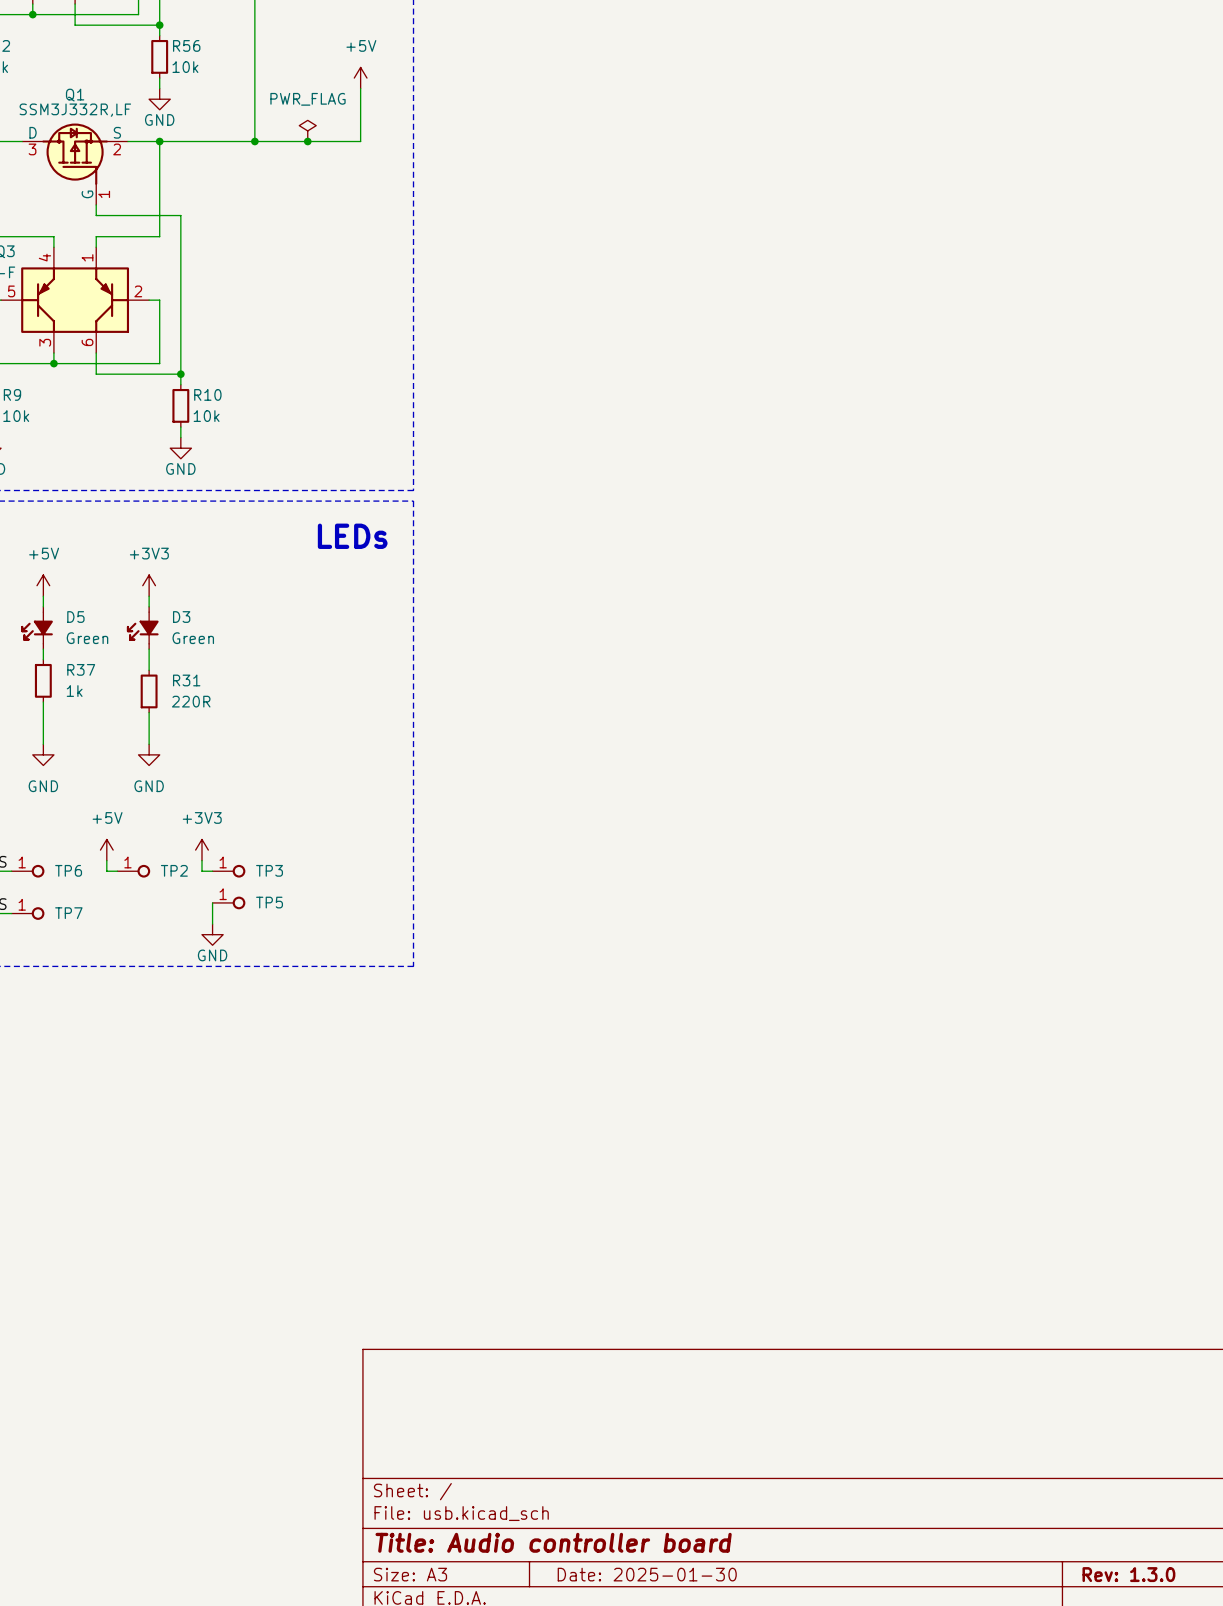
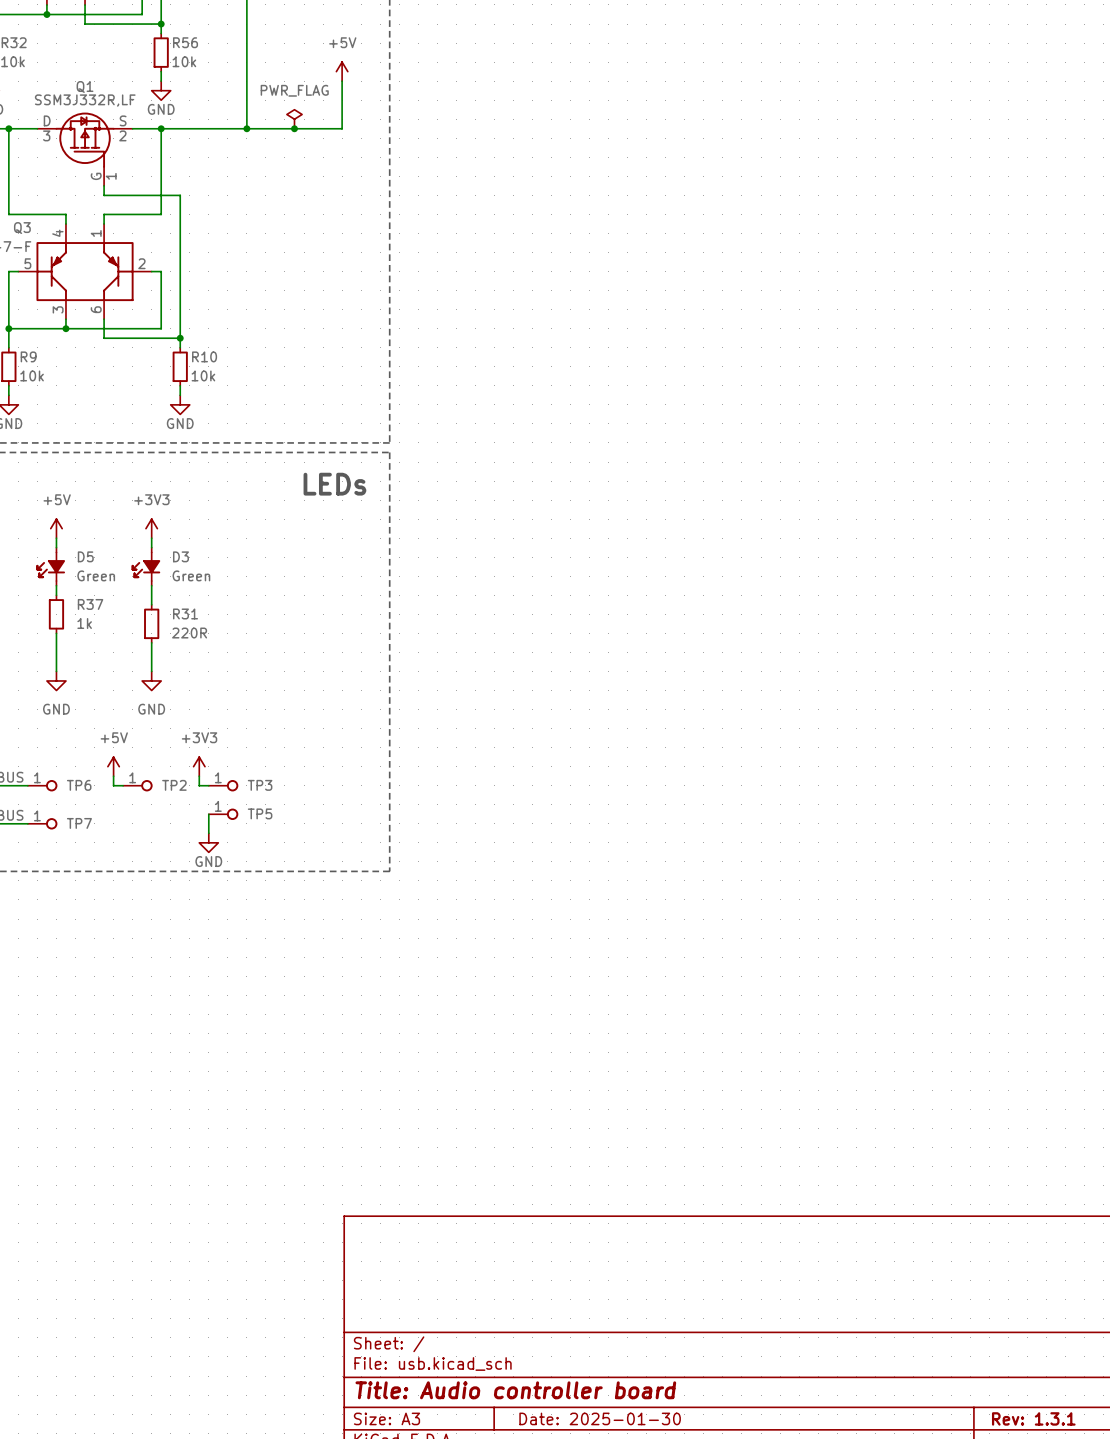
title block: Rev: 1.3.0 (1128, 1574) -> Rev: 1.3.1 (1033, 1418)

